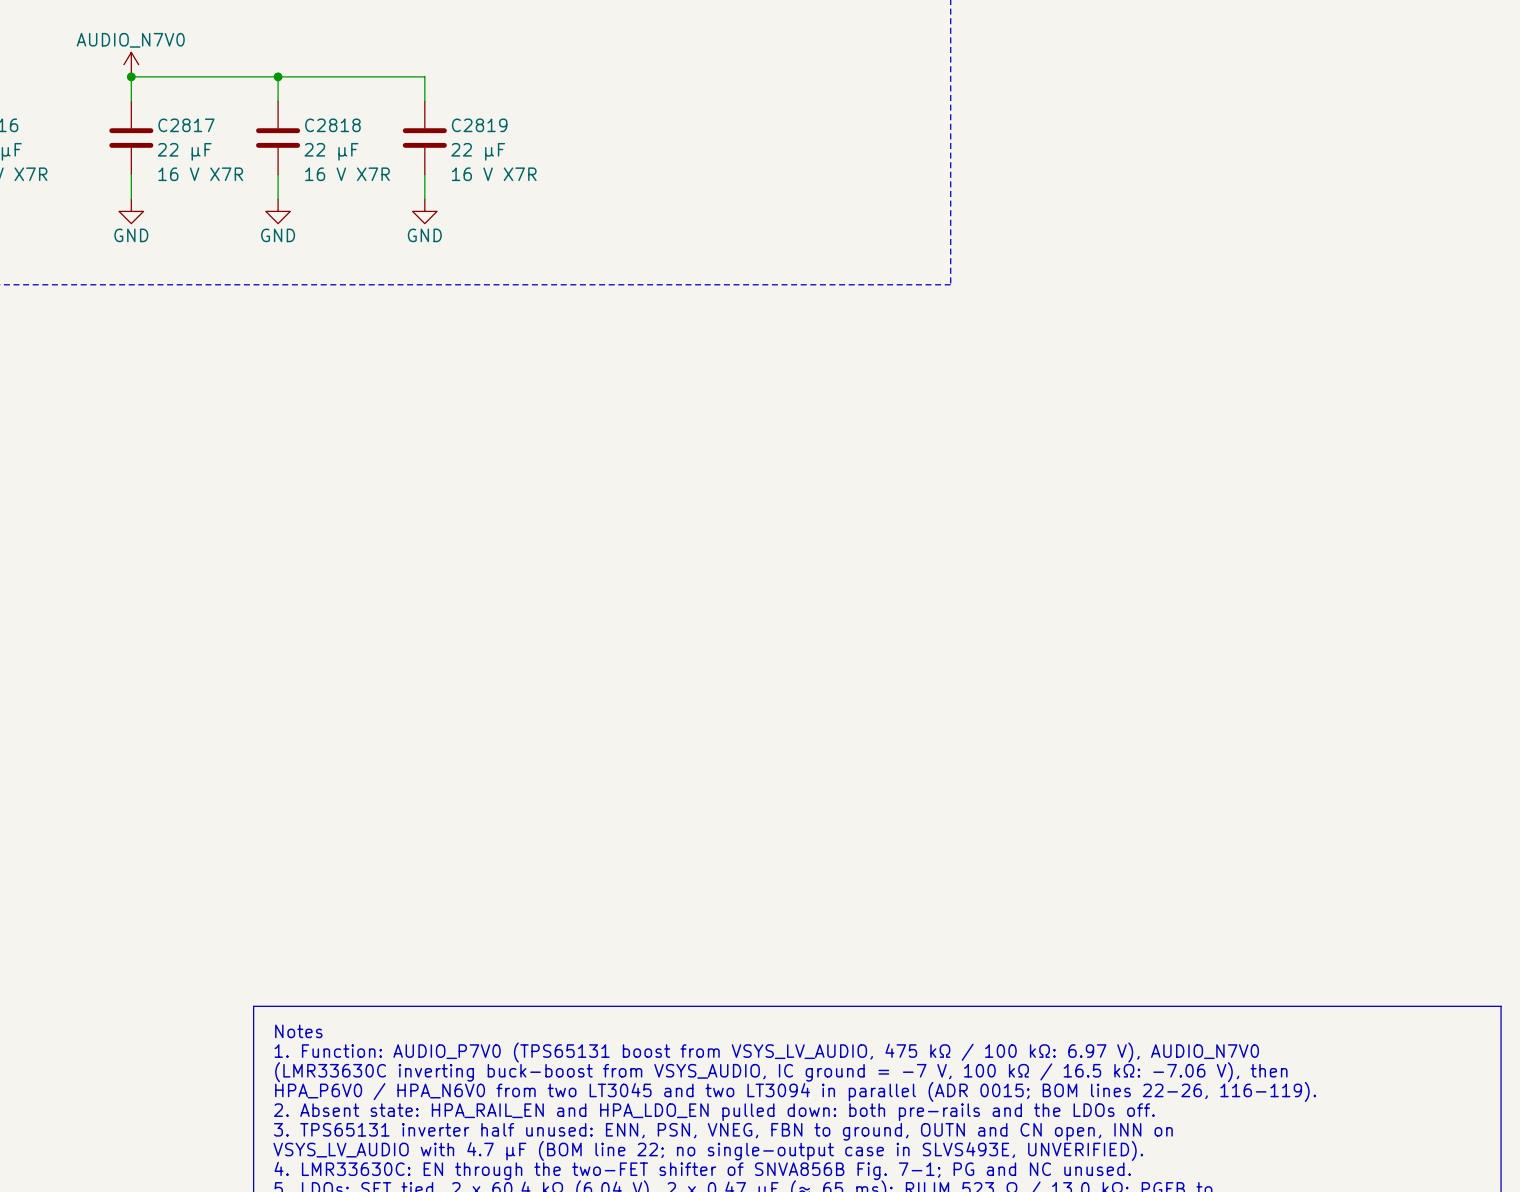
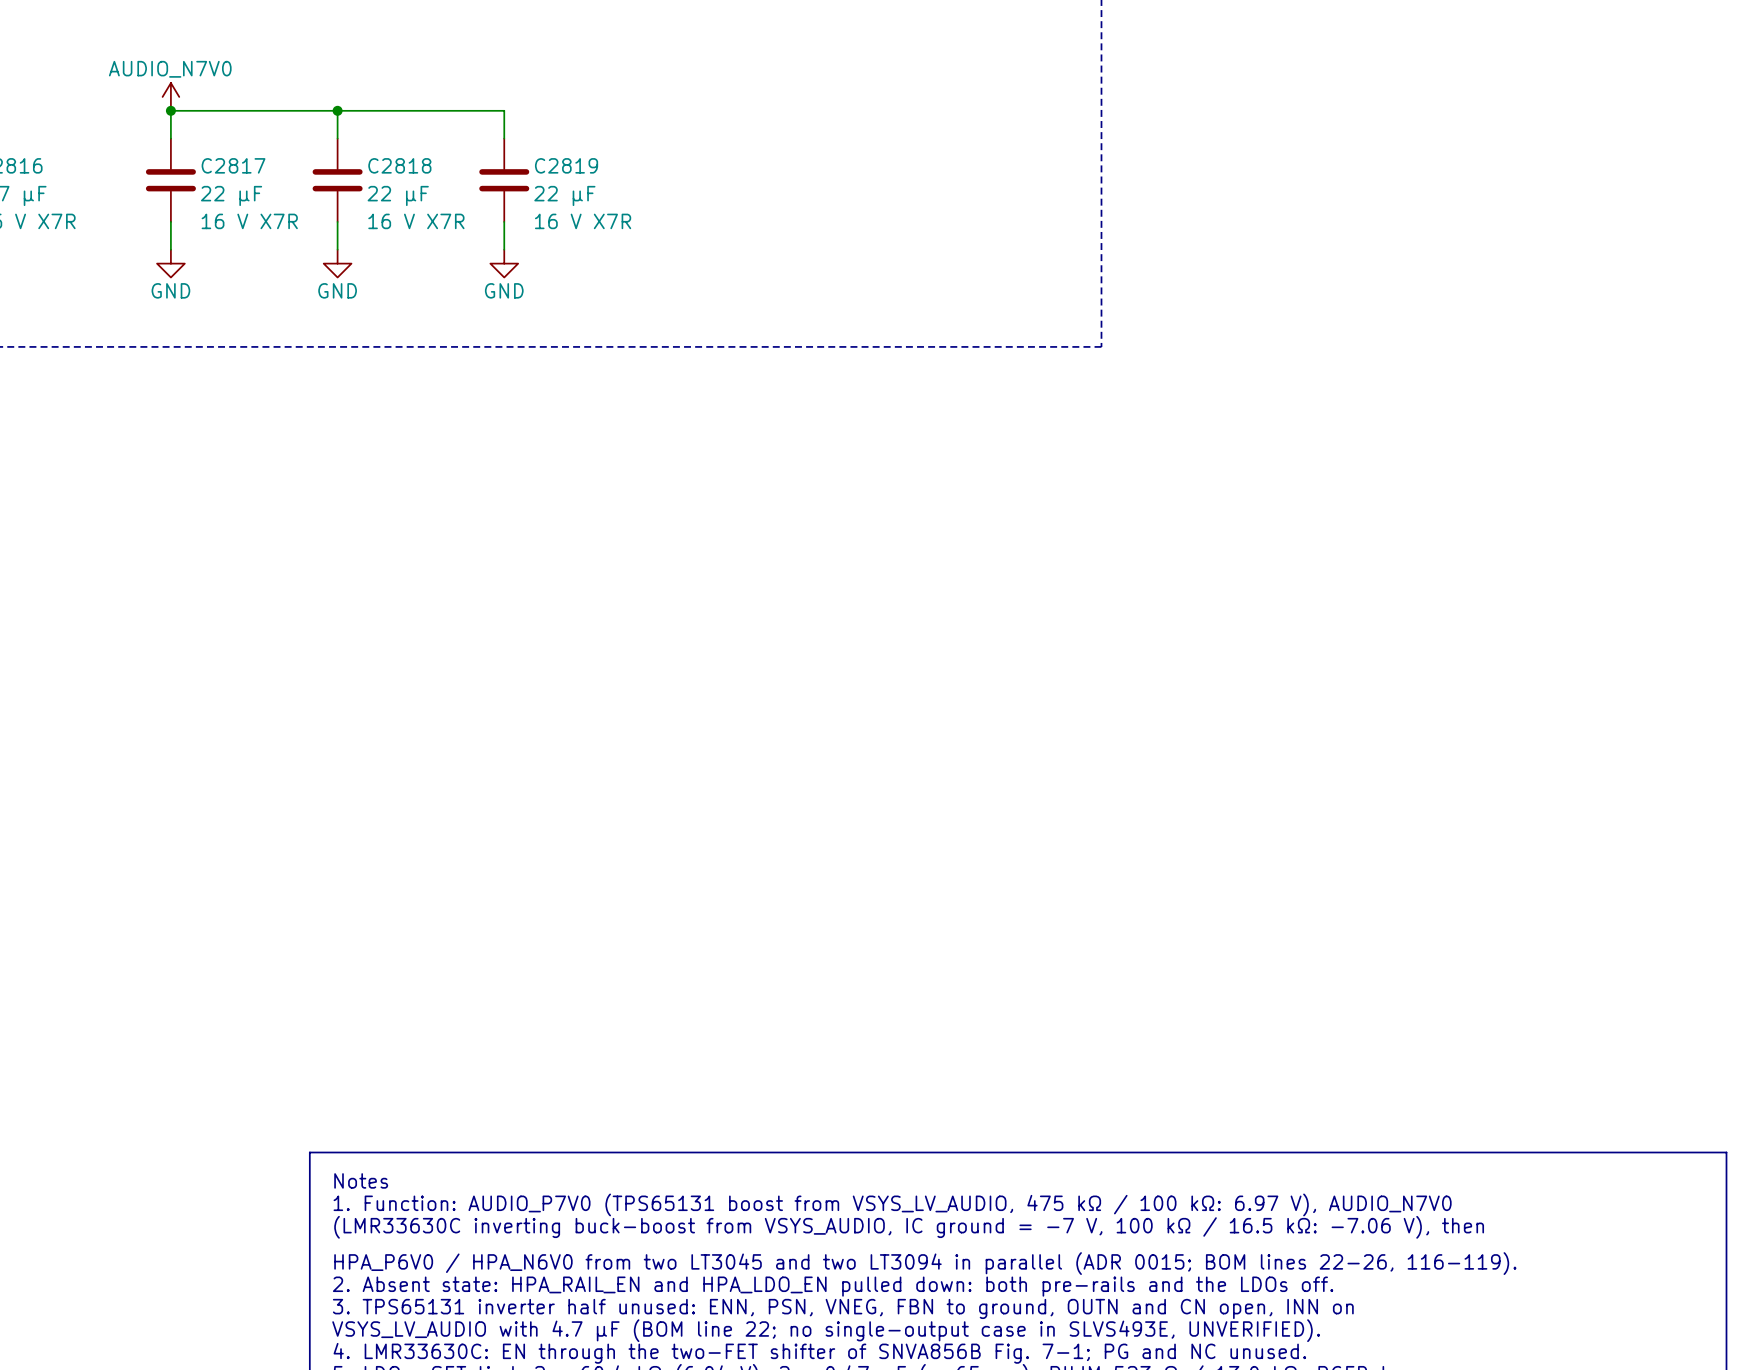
line: (253, 1006) (1501, 1006) -> (309, 1166) (309, 1152) (1726, 1152) (1726, 1166)
text position: Notes (298, 1031) -> Notes (361, 1180)
text position: 1. Function: AUDIO_P7V0 (TPS65131 boost from VSYS_LV_AUDIO, 475 kΩ / 100 kΩ: 6.97 V), AUDIO_N7V0 (766, 1052) -> 1. Function: AUDIO_P7V0 (TPS65131 boost from VSYS_LV_AUDIO, 475 kΩ / 100 kΩ: 6.97 V), AUDIO_N7V0 (892, 1204)
text position: (LMR33630C inverting buck-boost from VSYS_AUDIO, IC ground = -7 V, 100 kΩ / 16.5 kΩ: -7.06 V), then (781, 1072) -> (LMR33630C inverting buck-boost from VSYS_AUDIO, IC ground = -7 V, 100 kΩ / 16.5 kΩ: -7.06 V), then (909, 1227)

